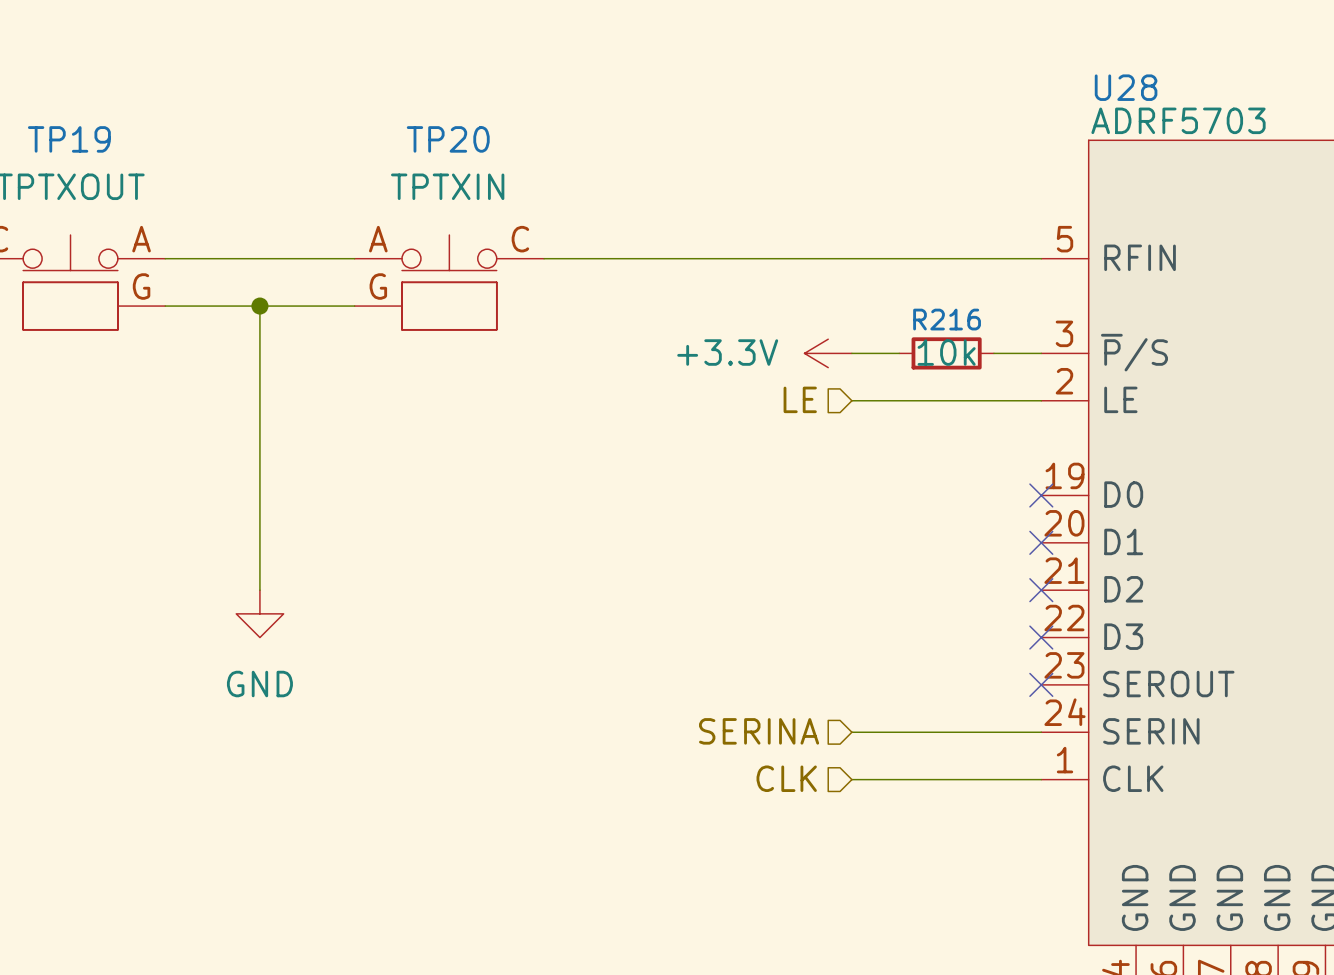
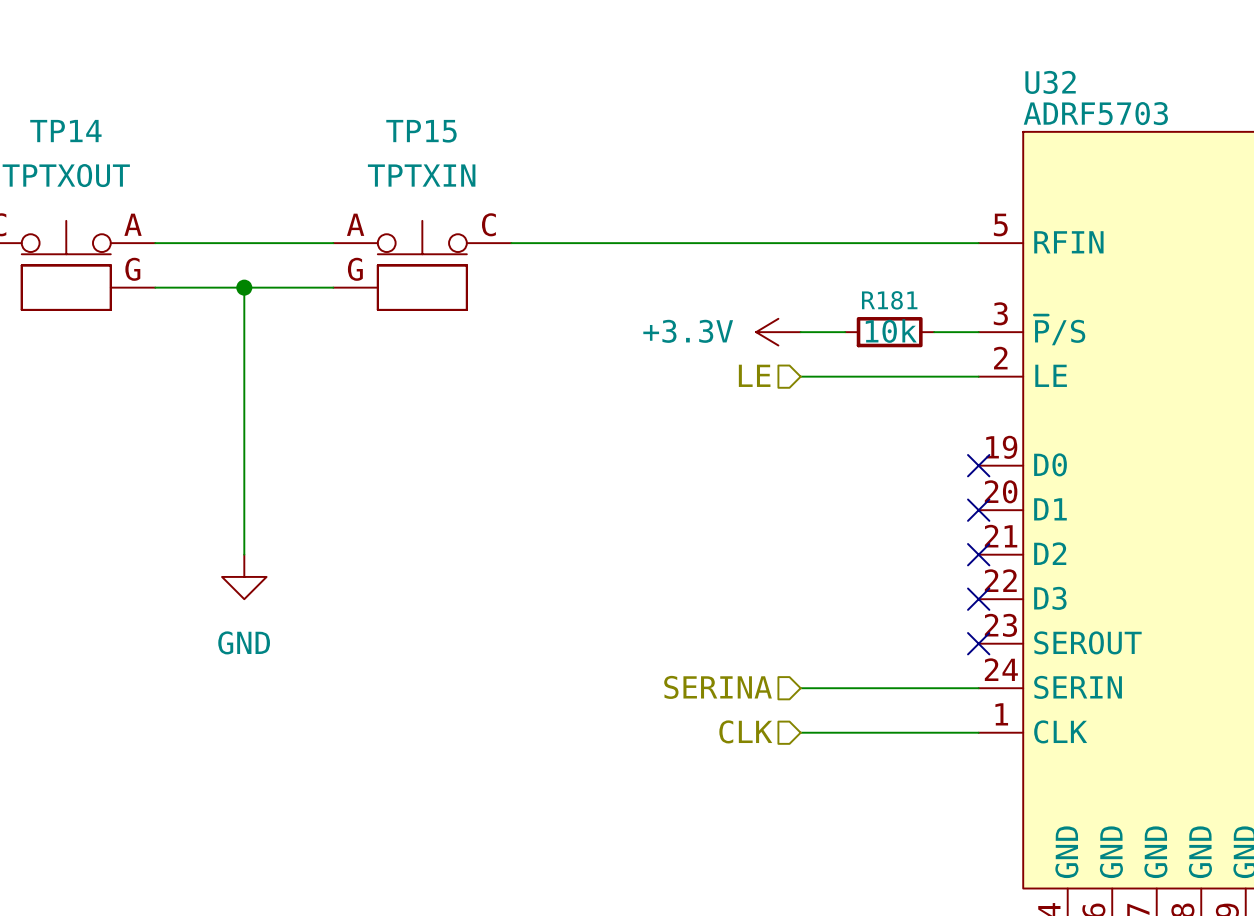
U28 name: U28 (1126, 87) -> U32 (1050, 82)
TP19 name: TP19 (69, 139) -> TP14 (65, 131)
TP20 name: TP20 (448, 139) -> TP15 (421, 131)
R216 name: R216 (947, 319) -> R181 (889, 300)

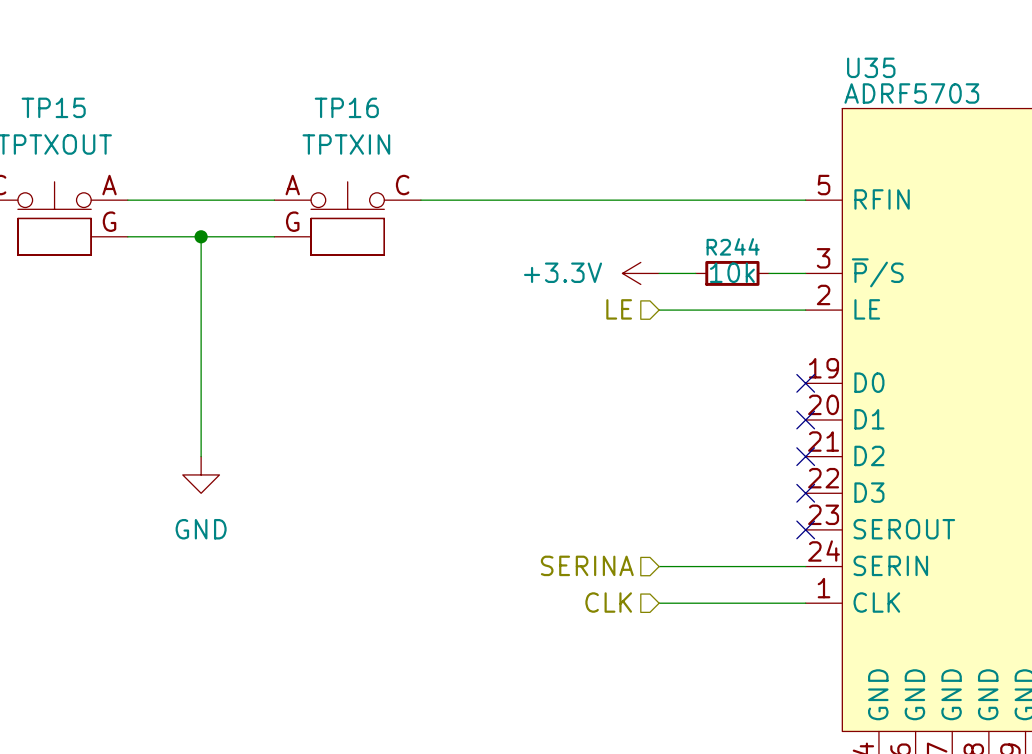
U32 name: U32 (1050, 82) -> U35 (871, 67)
TP14 name: TP14 (65, 131) -> TP15 (53, 107)
TP15 name: TP15 (421, 131) -> TP16 (346, 107)
R181 name: R181 (889, 300) -> R244 (733, 246)

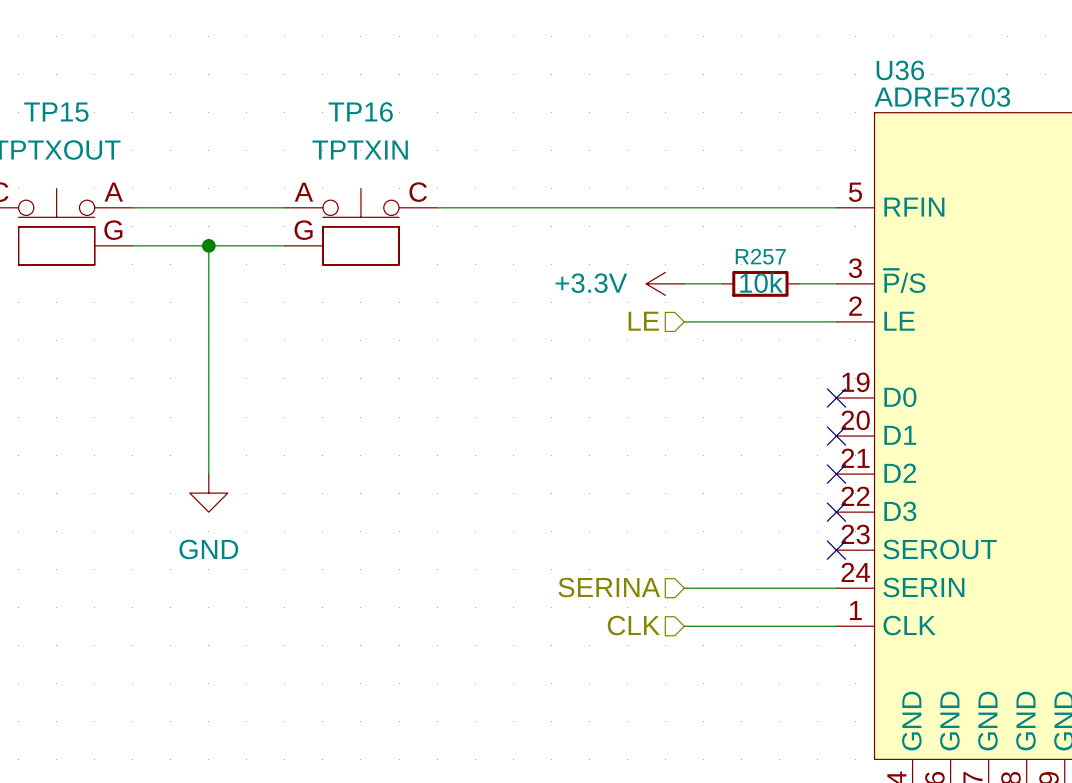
U35 name: U35 (871, 67) -> U36 (900, 70)
R244 name: R244 (733, 246) -> R257 (760, 256)

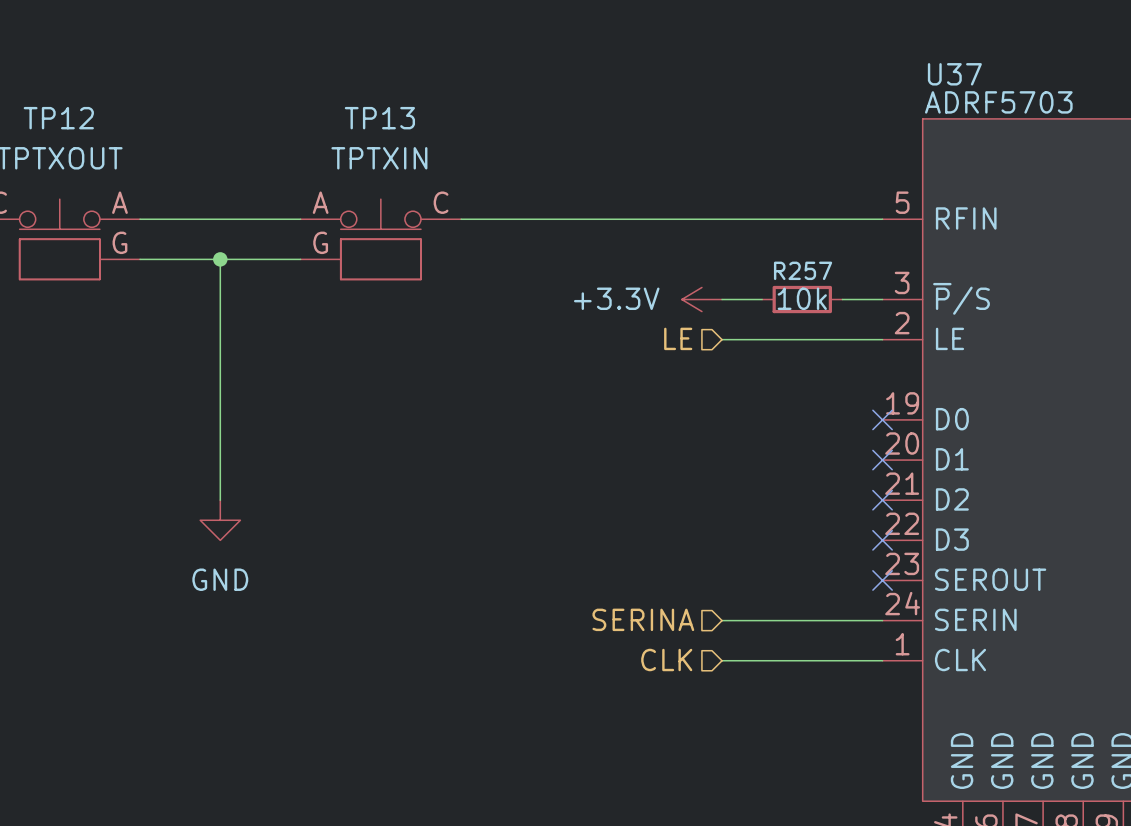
U36 name: U36 (900, 70) -> U37 (954, 74)
TP16 name: TP16 (360, 111) -> TP13 (379, 118)
TP15 name: TP15 (56, 112) -> TP12 (58, 118)

